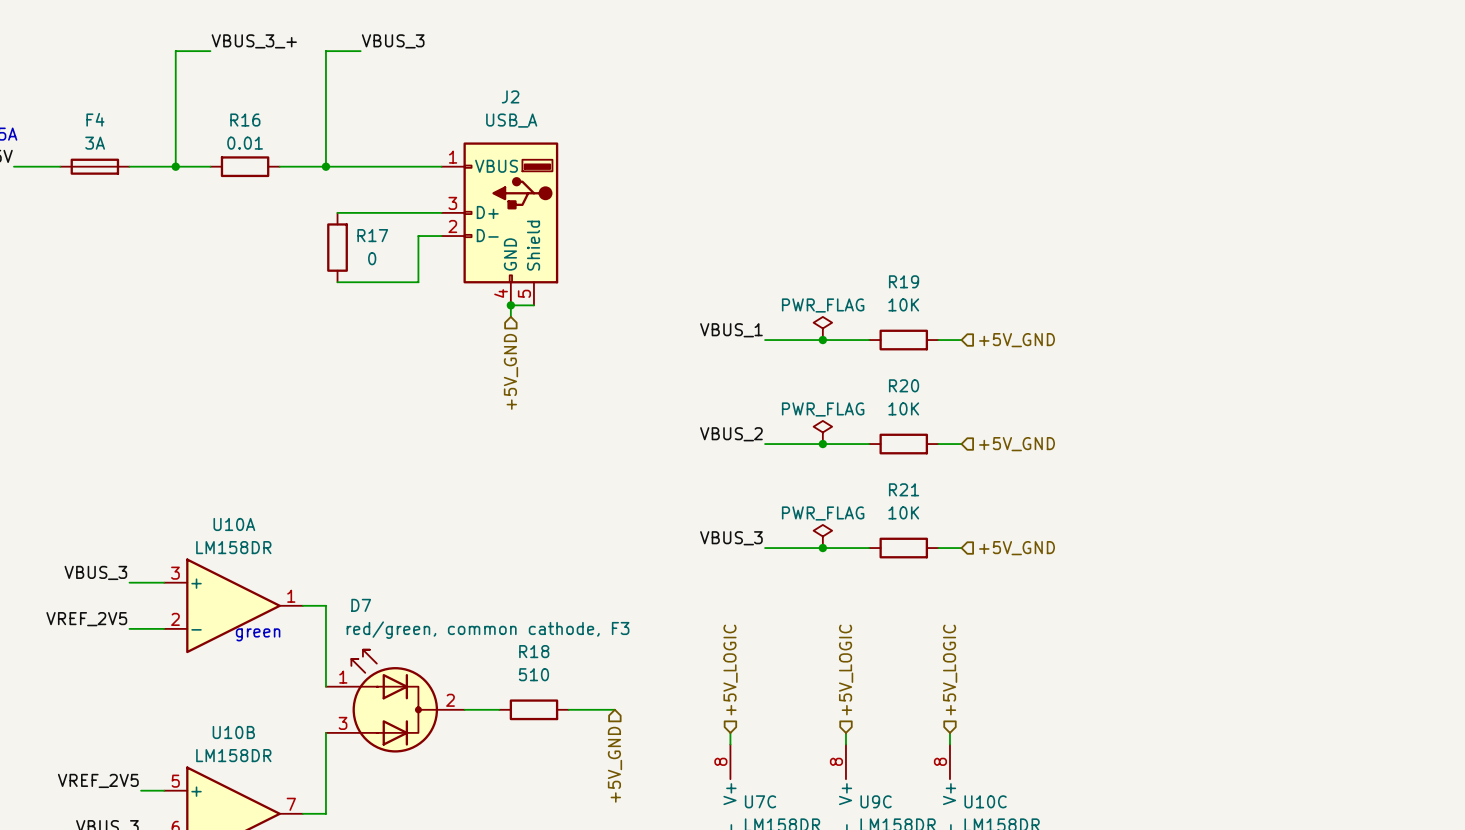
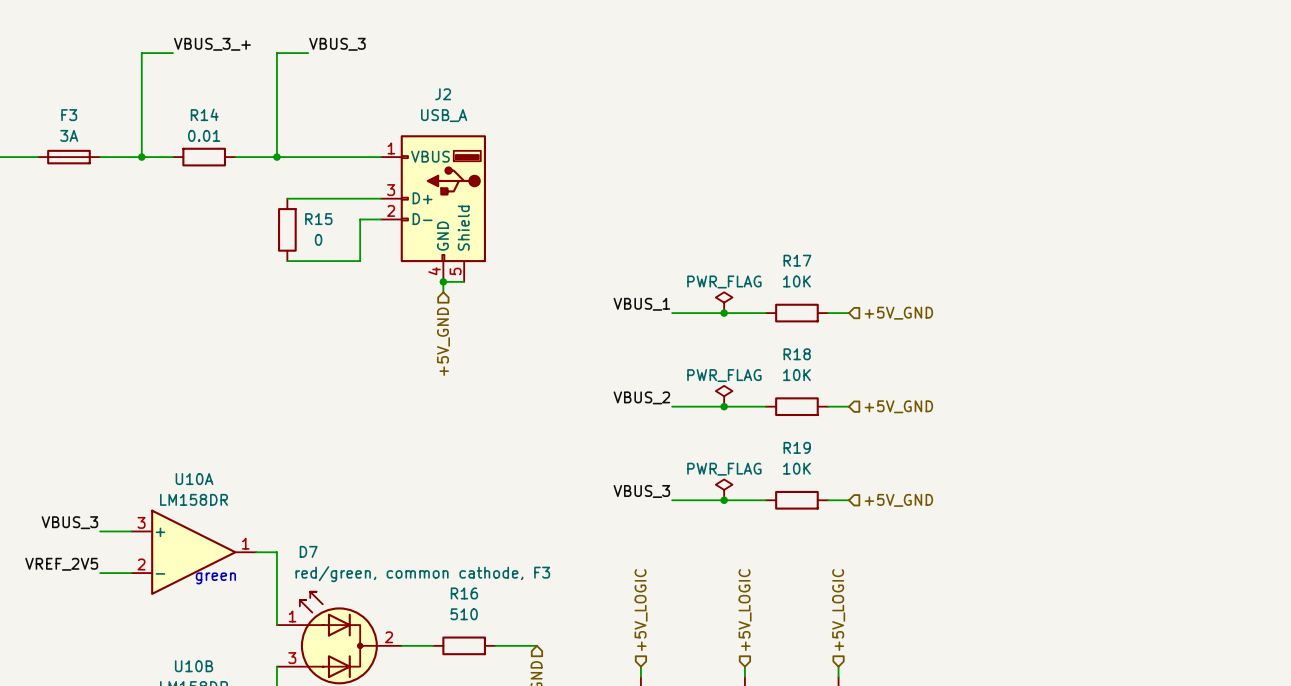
F4 name: F4 (95, 119) -> F3 (69, 115)
R16 name: R16 (245, 120) -> R14 (204, 114)
R17 name: R17 (372, 235) -> R15 (318, 219)
R19 name: R19 (904, 281) -> R17 (797, 260)
R20 name: R20 (904, 385) -> R18 (797, 354)
R21 name: R21 (904, 489) -> R19 (797, 447)
R18 name: R18 (534, 651) -> R16 (464, 593)

